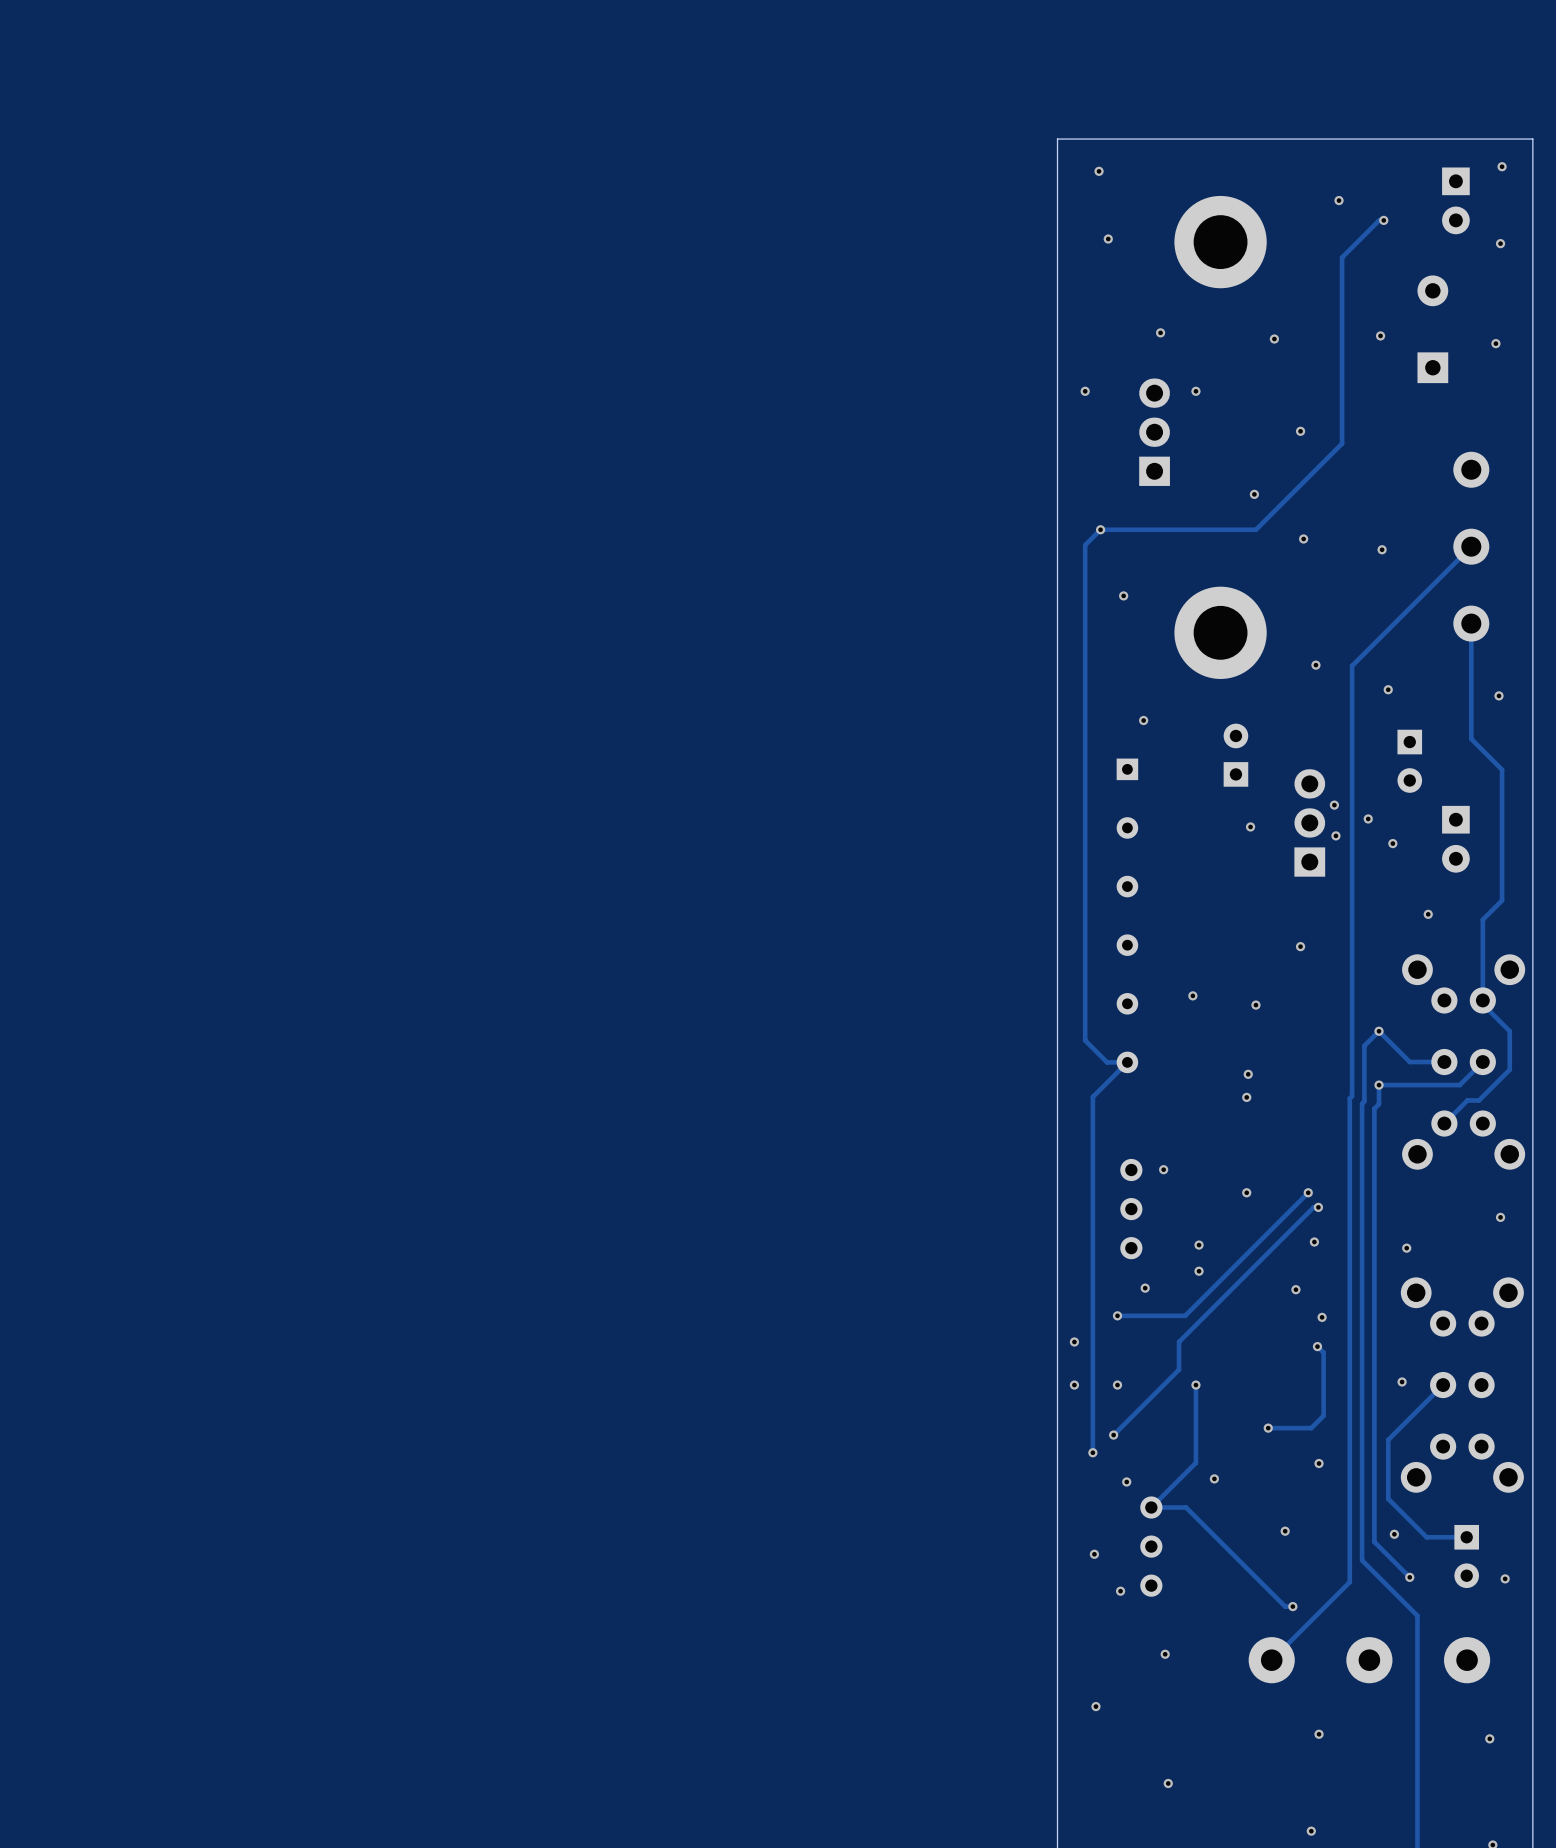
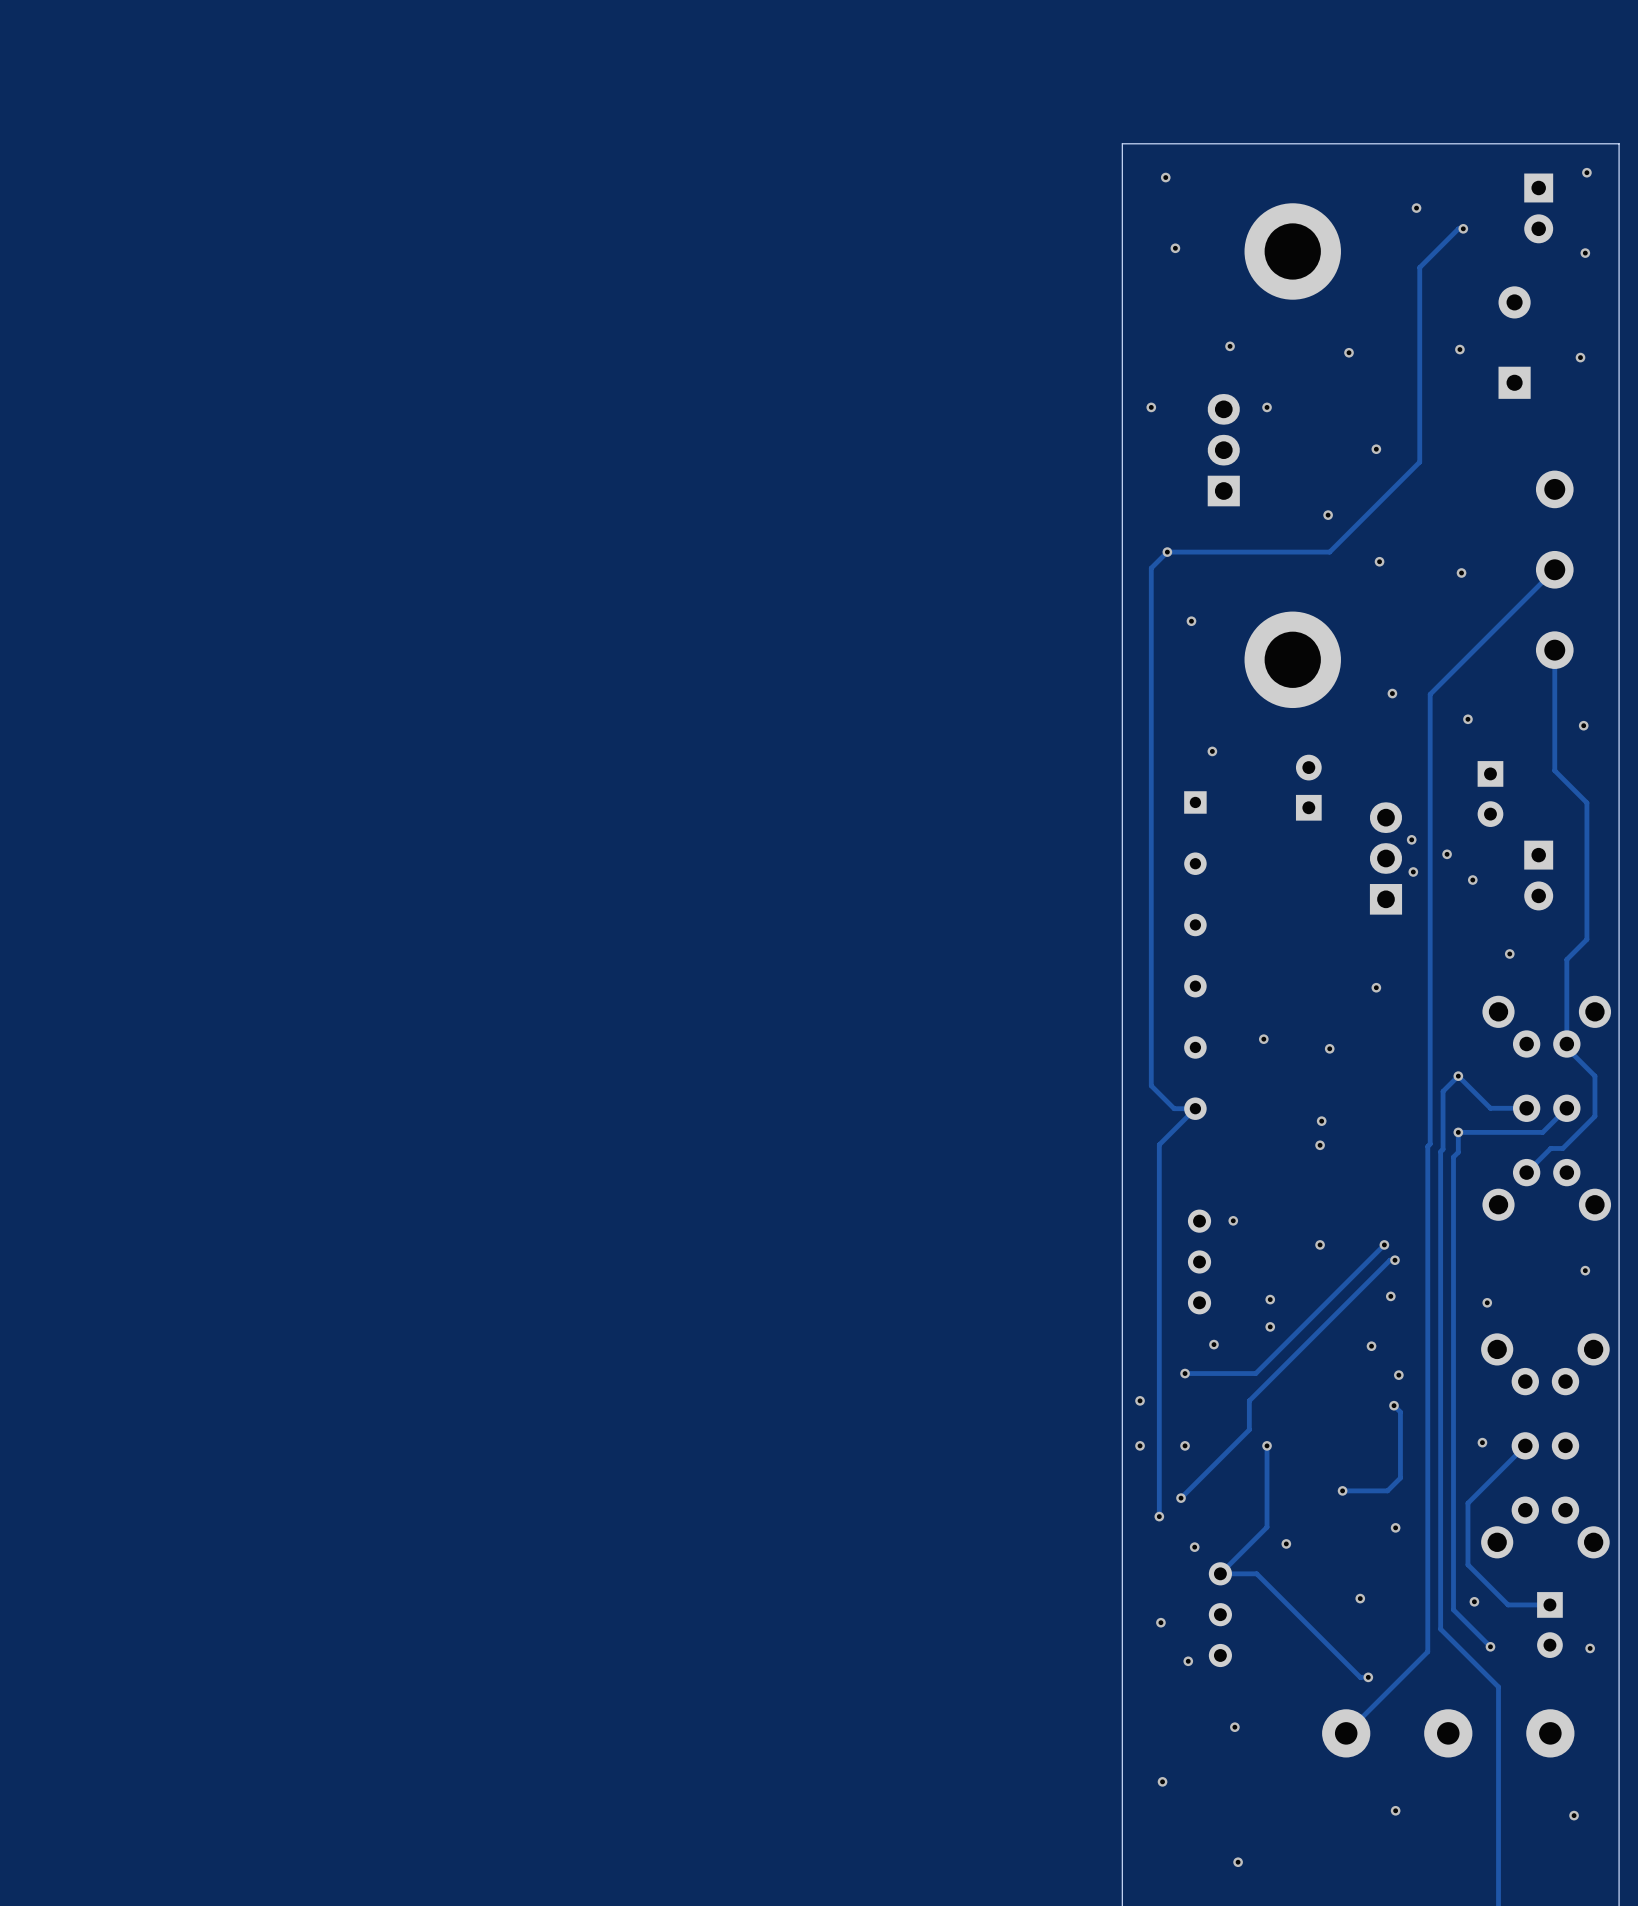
via: (1250, 826) -> none

